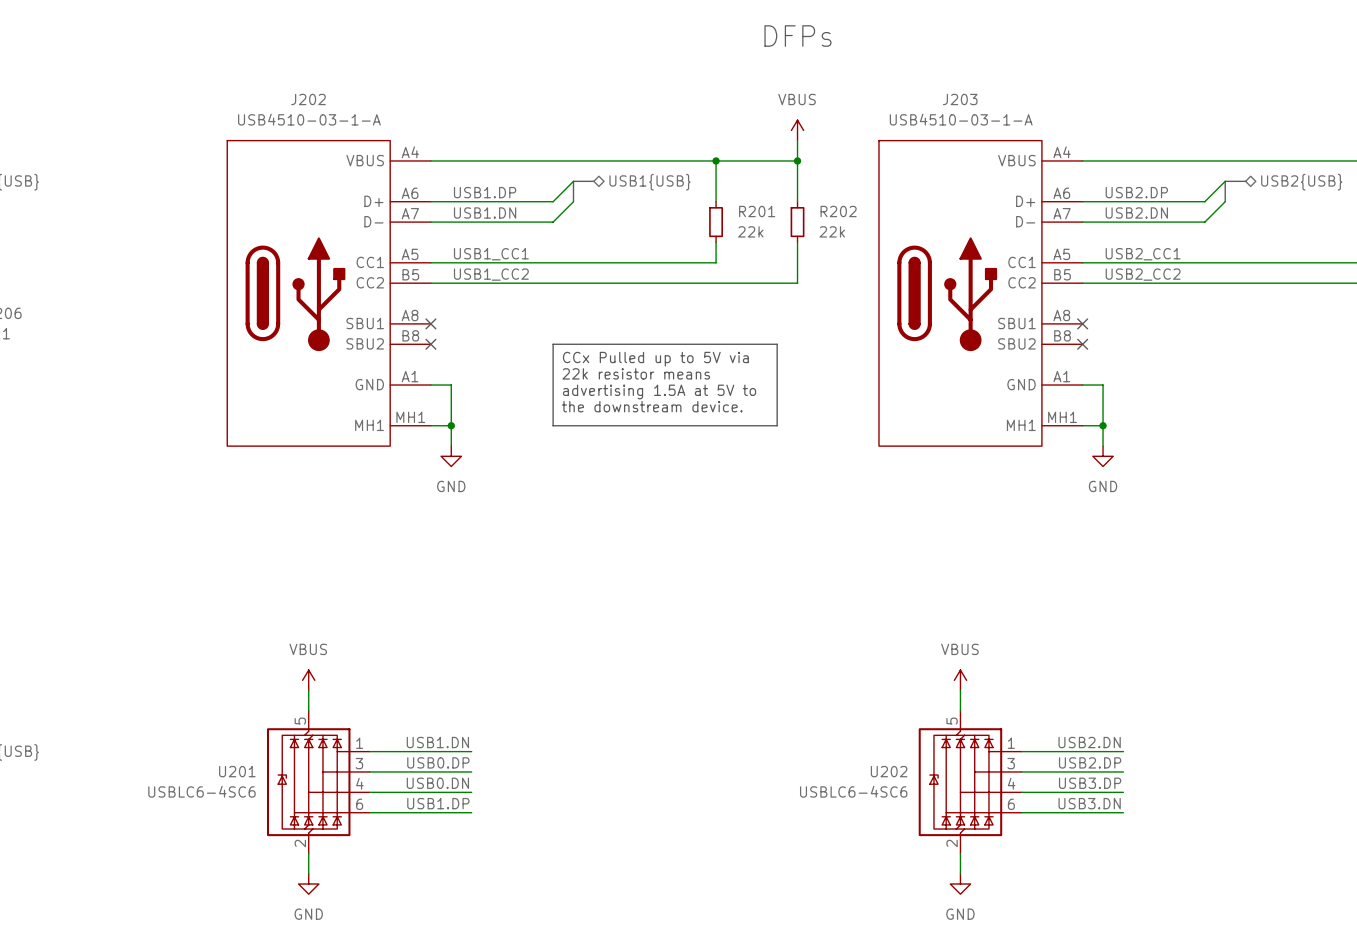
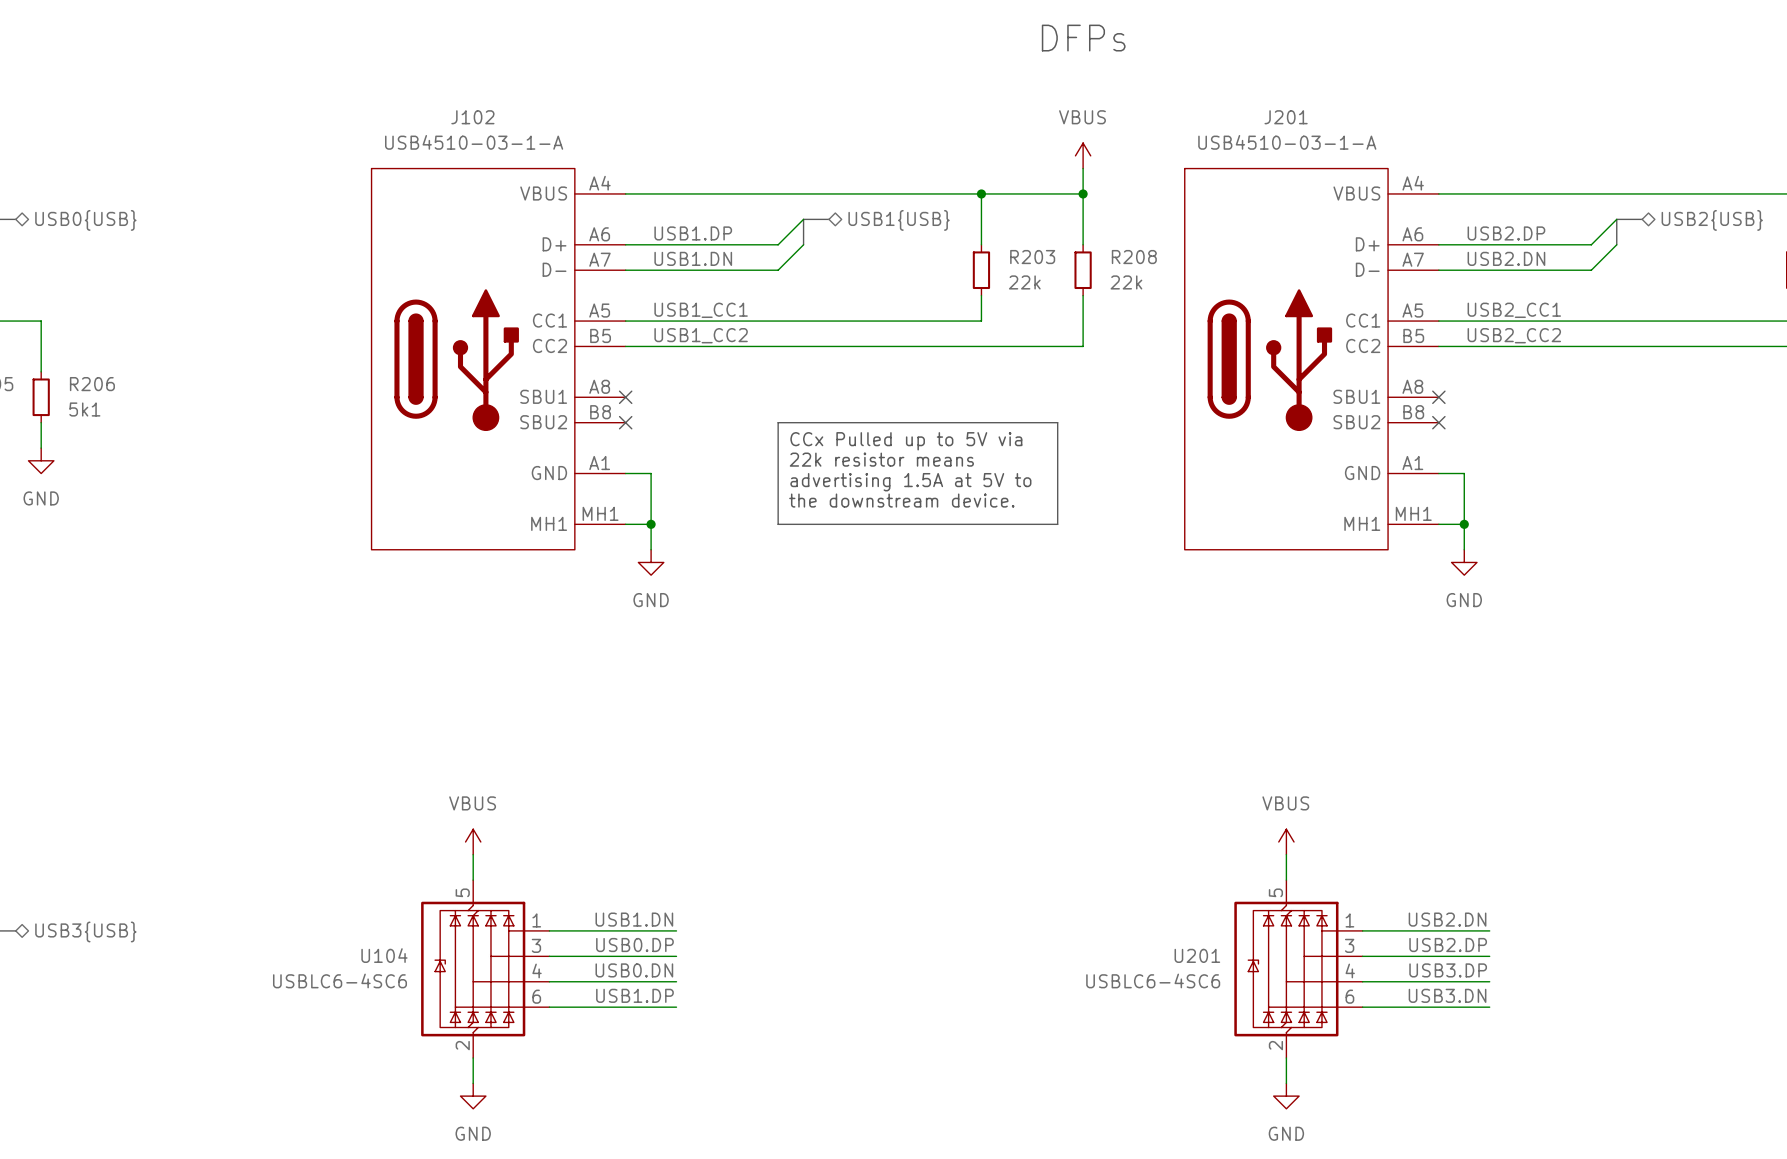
J202 name: J202 (308, 99) -> J102 (472, 117)
J203 name: J203 (960, 99) -> J201 (1286, 117)
R201 name: R201 (757, 211) -> R203 (1032, 257)
R202 name: R202 (838, 211) -> R208 (1134, 257)
U201 name: U201 (237, 771) -> U104 (384, 955)
U202 name: U202 (889, 771) -> U201 (1197, 955)

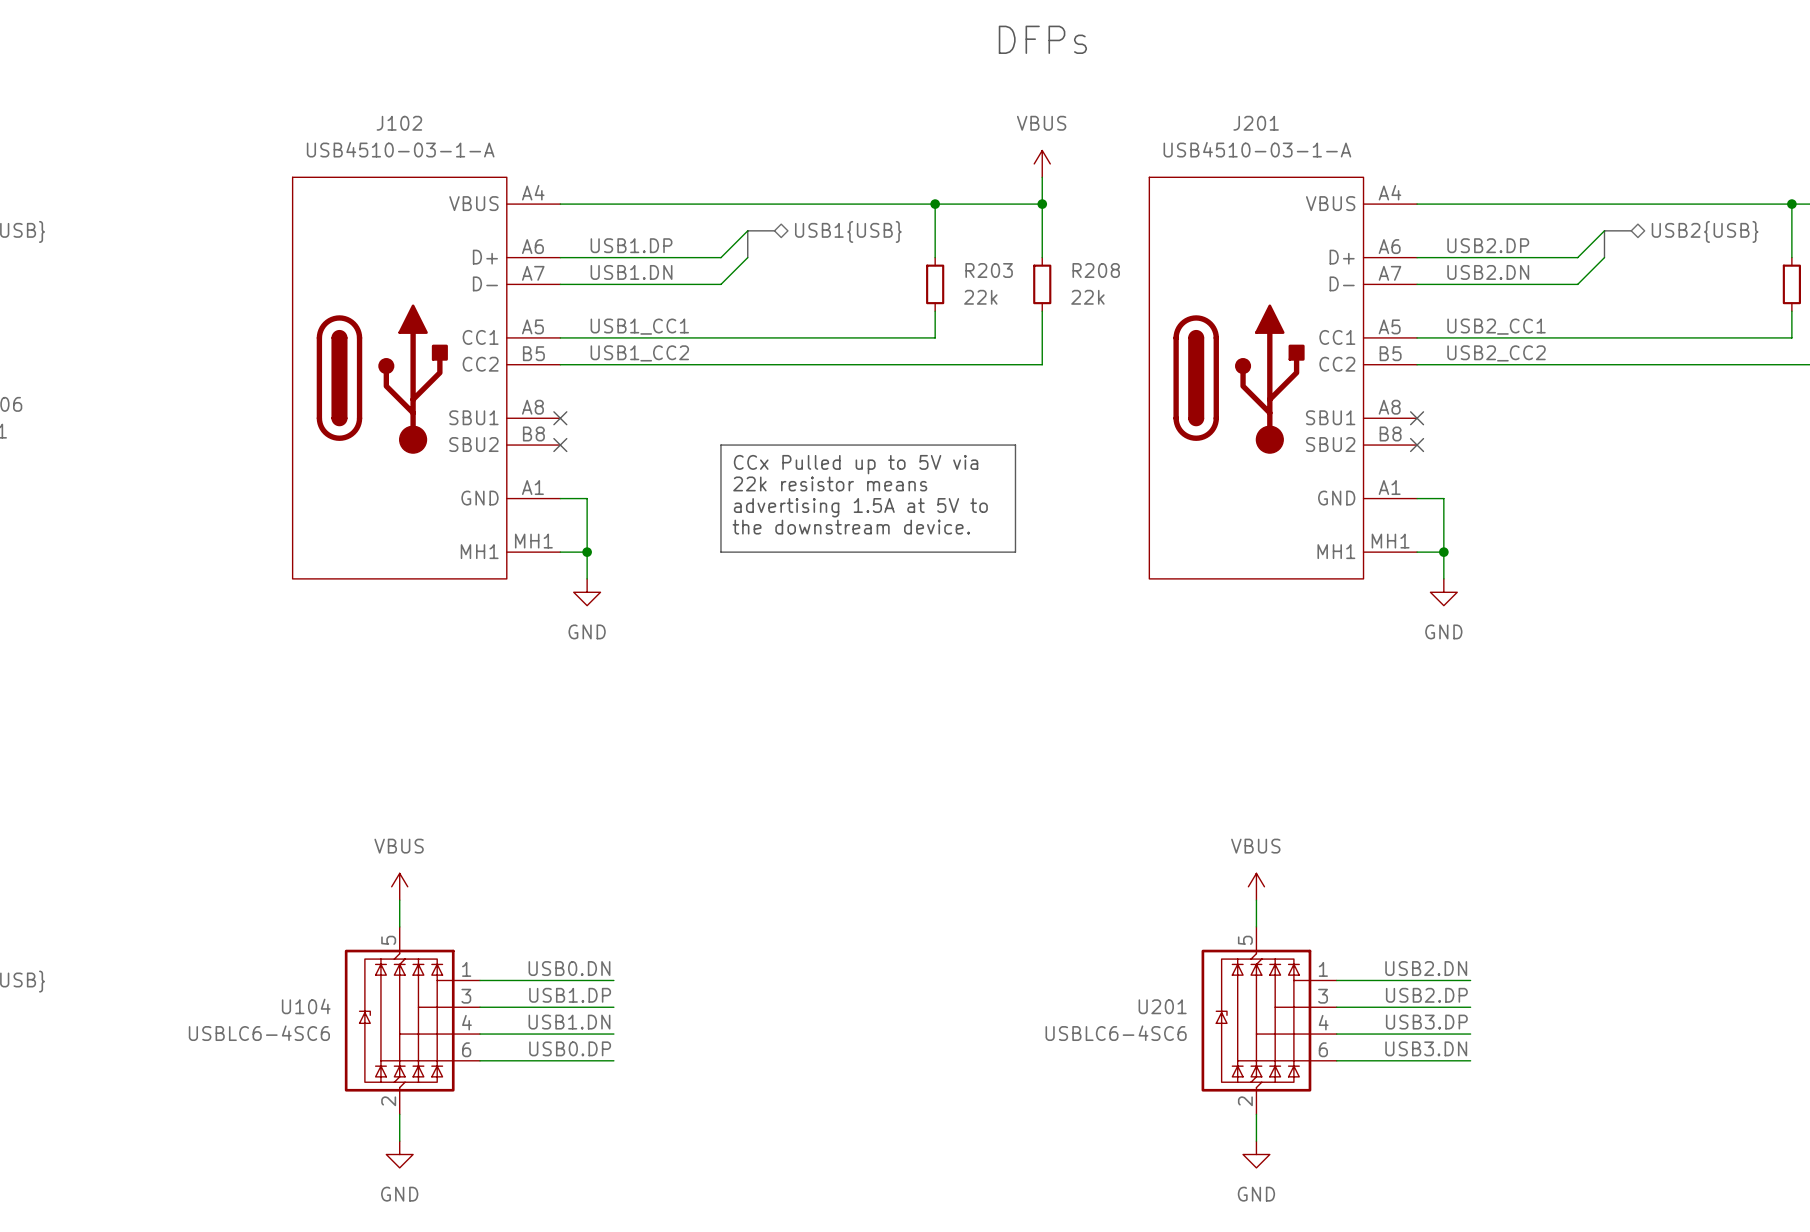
label: USB1.DN (634, 919) -> USB0.DN (569, 968)
label: USB0.DP (634, 945) -> USB1.DP (570, 995)
label: USB0.DN (634, 970) -> USB1.DN (569, 1022)
label: USB1.DP (634, 995) -> USB0.DP (570, 1048)

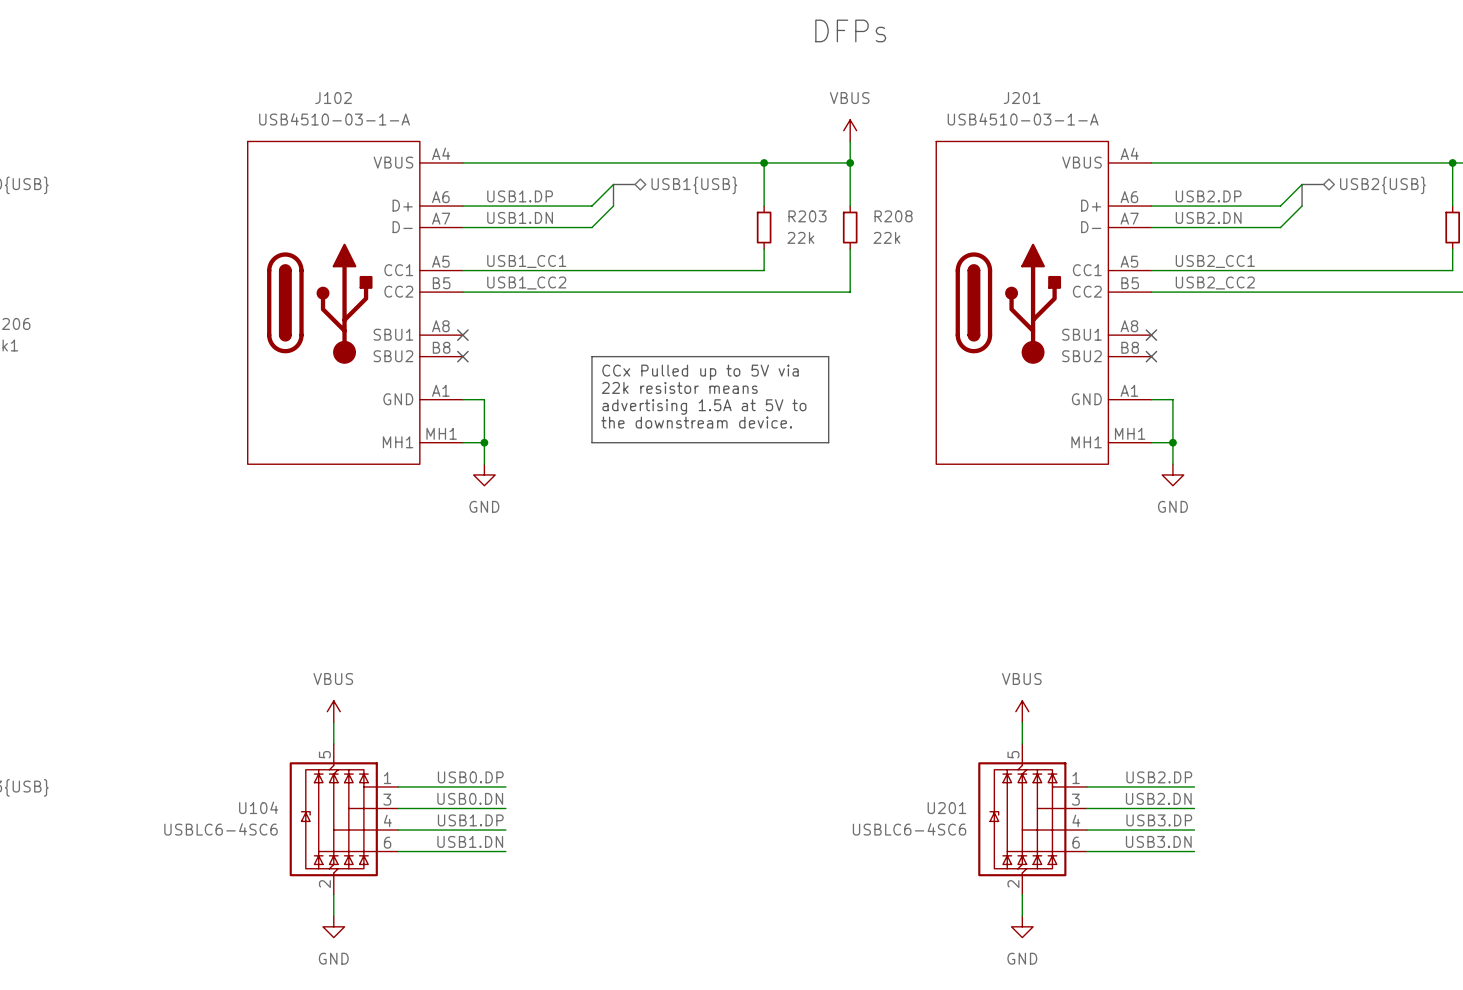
label: USB0.DN (569, 968) -> USB0.DP (470, 777)
label: USB2.DN (1426, 968) -> USB2.DP (1159, 777)
label: USB1.DP (570, 995) -> USB0.DN (470, 798)
label: USB2.DP (1426, 995) -> USB2.DN (1158, 798)
label: USB1.DN (569, 1022) -> USB1.DP (470, 820)
label: USB0.DP (570, 1048) -> USB1.DN (470, 841)

